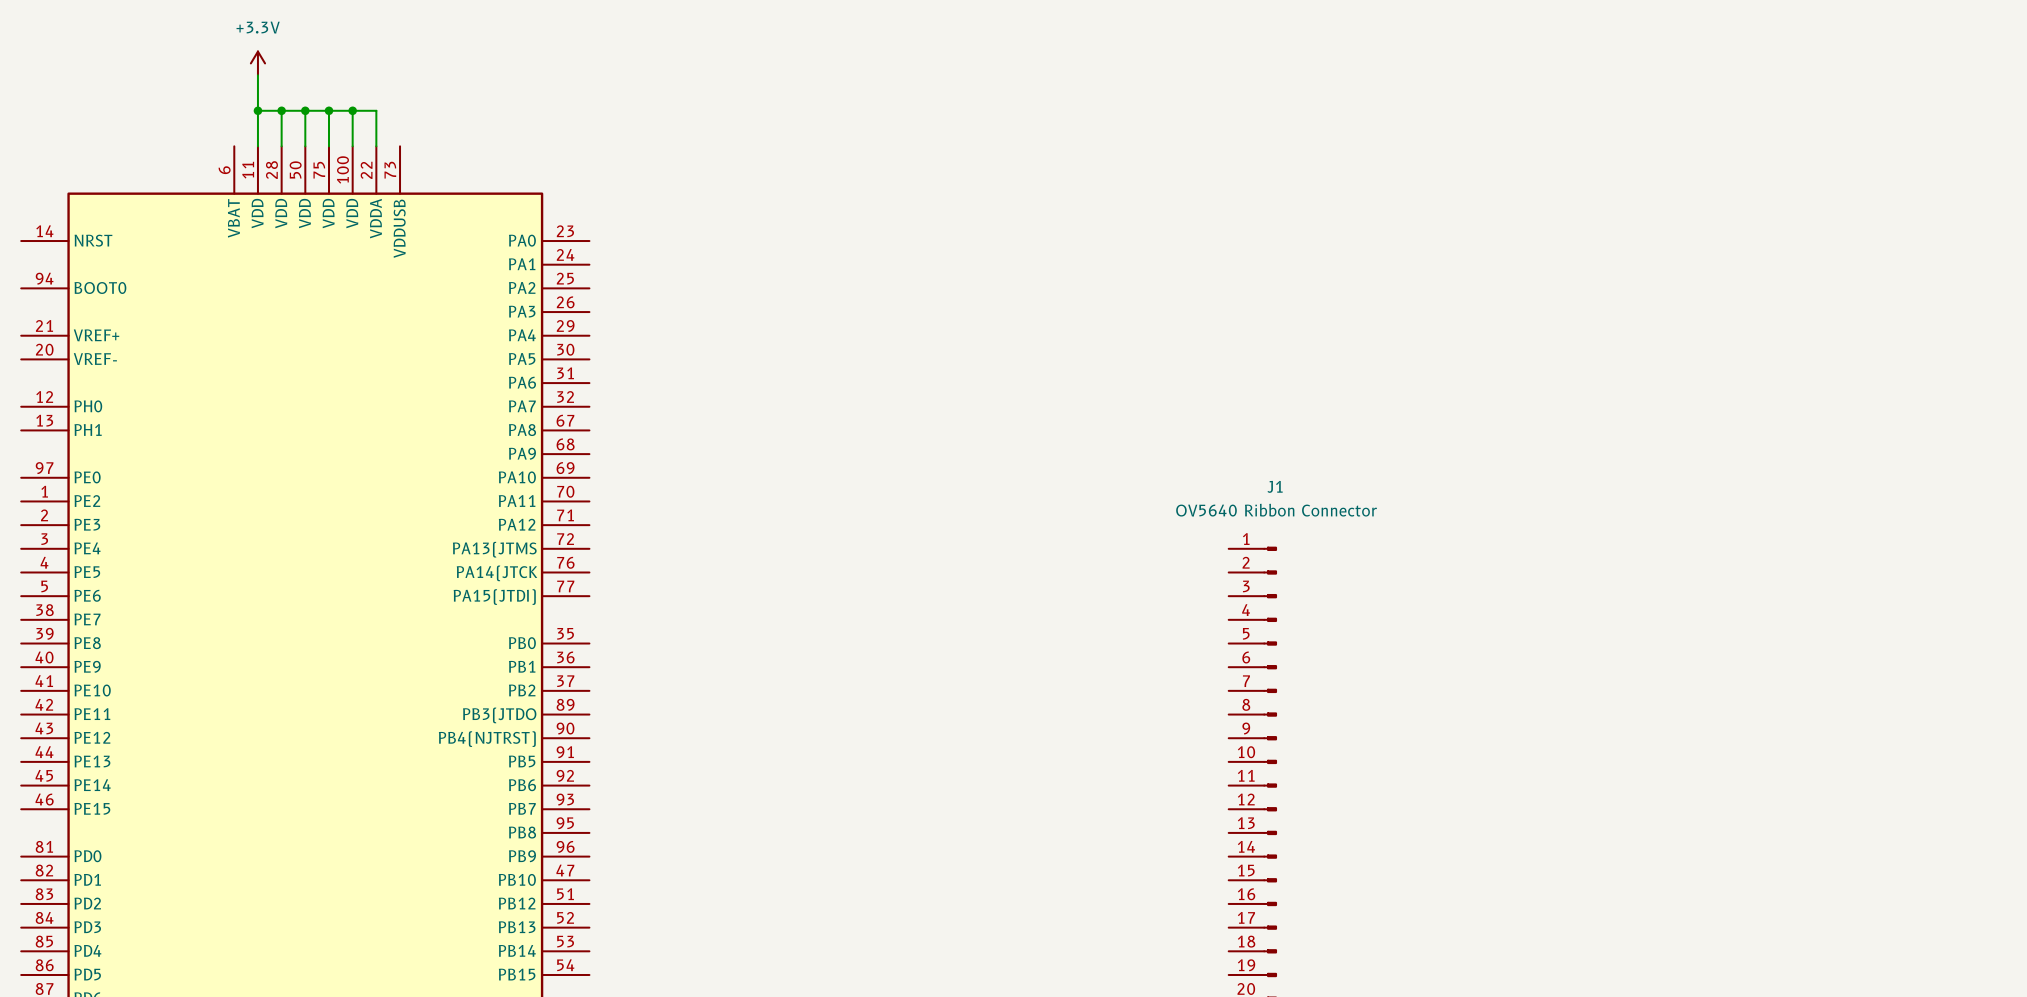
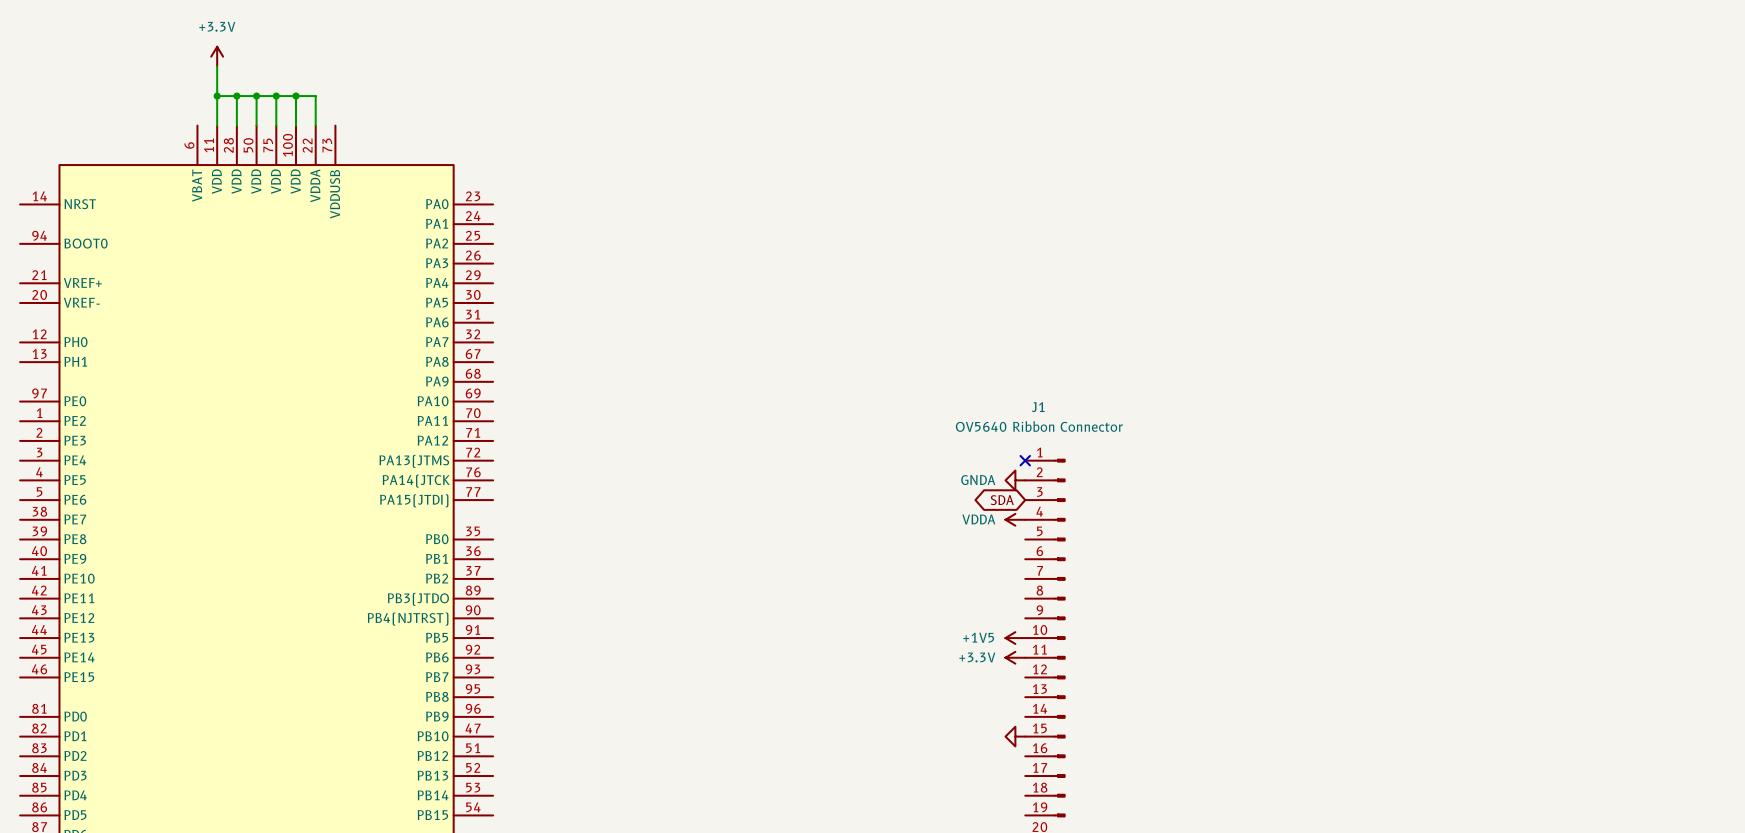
J1 name position: J1 (1275, 486) -> J1 (1038, 407)
J1 value position: OV5640 Ribbon Connector (1276, 510) -> OV5640 Ribbon Connector (1039, 426)
no-connect mark: none -> (1025, 460)
power symbol: none -> GNDA (1015, 480)
global label: none -> SDA (1002, 500)
power symbol: none -> VDDA (1015, 519)
power symbol: none -> +1V5 (1015, 638)
power symbol: none -> +3.3V (1015, 657)
power symbol: none -> (1015, 736)

